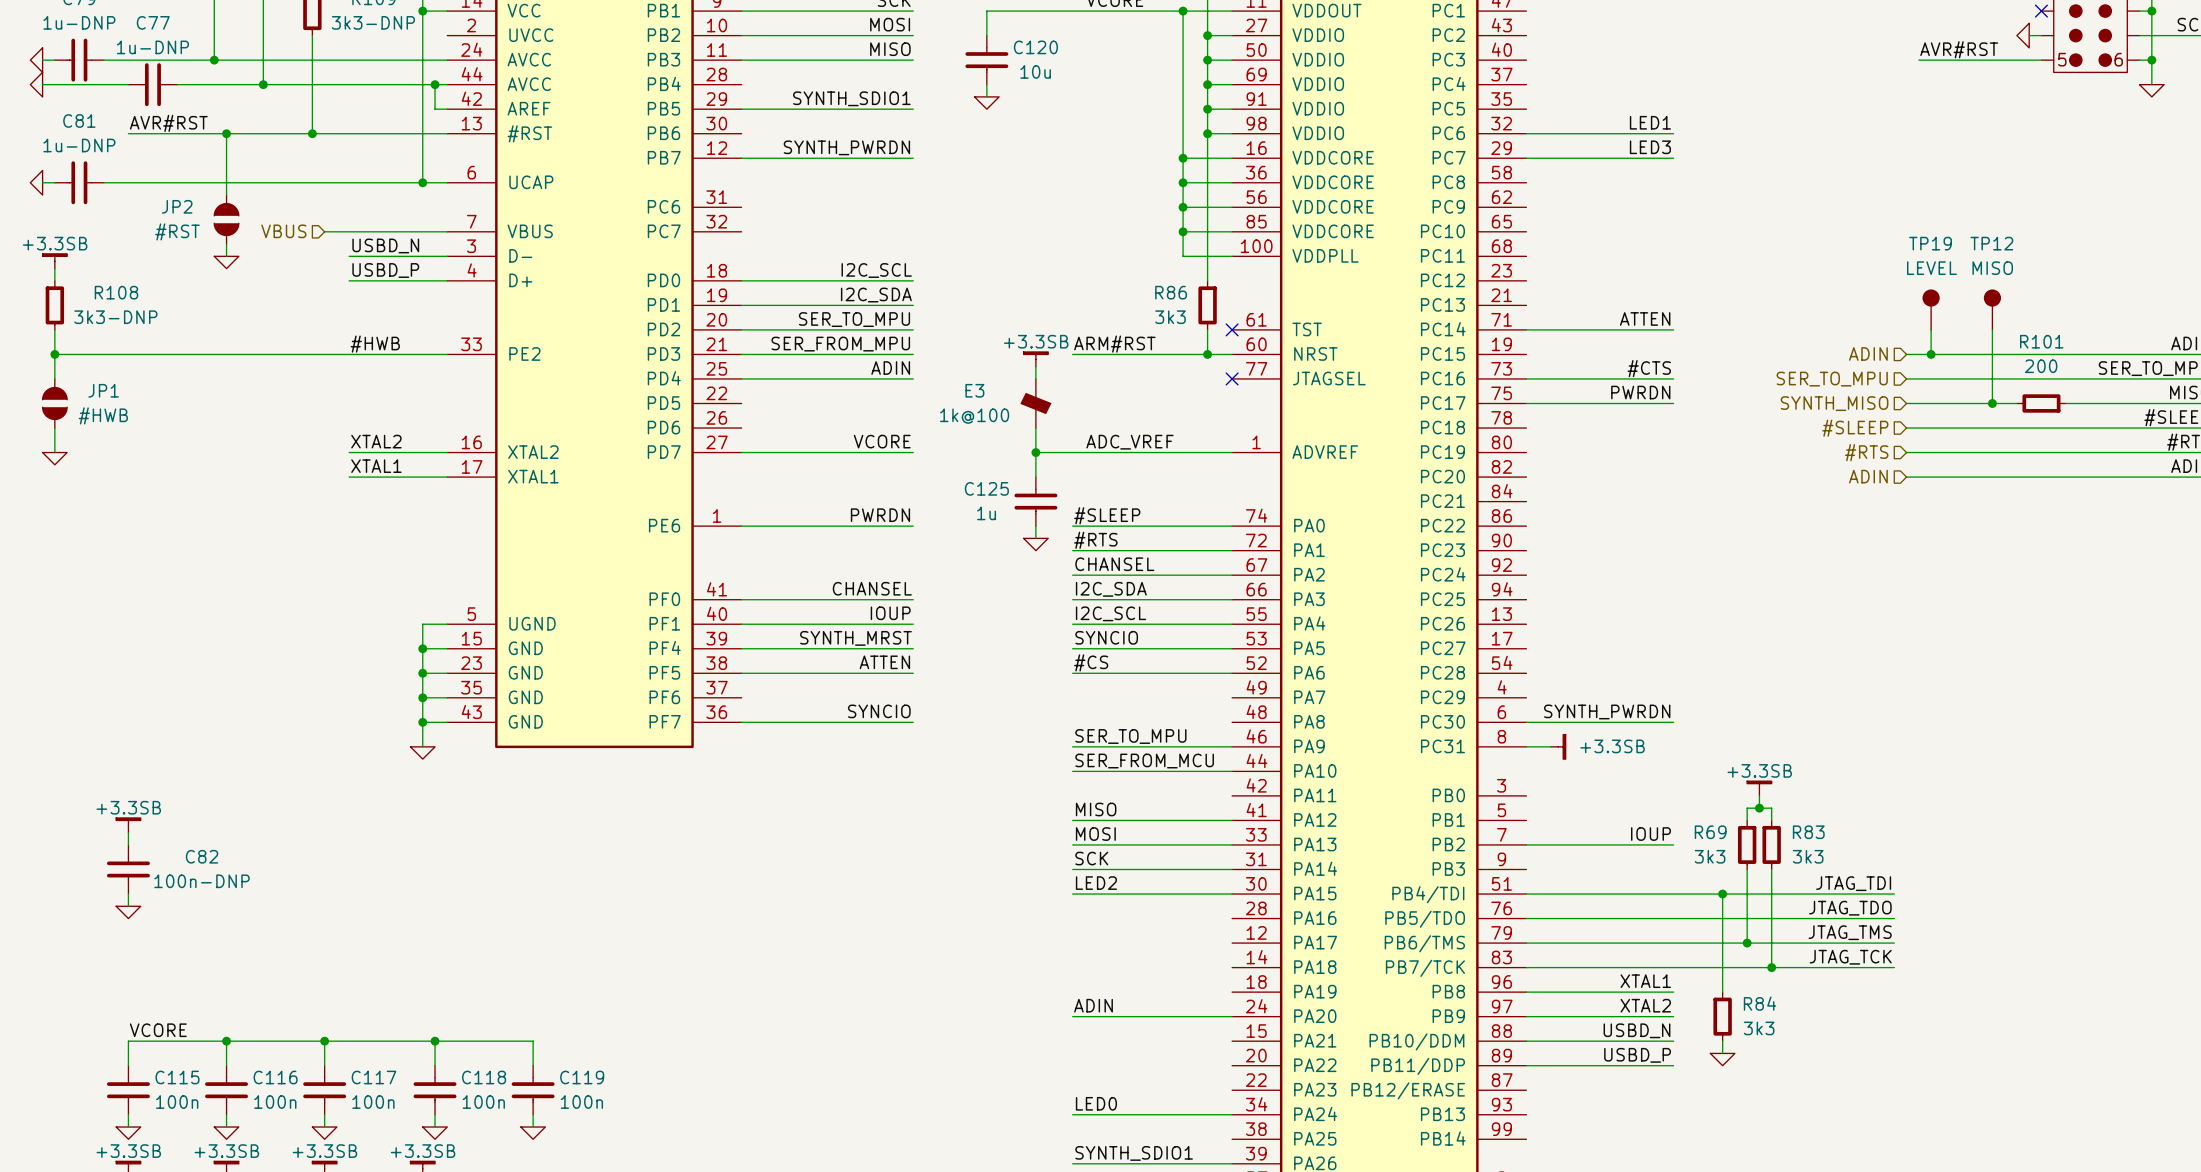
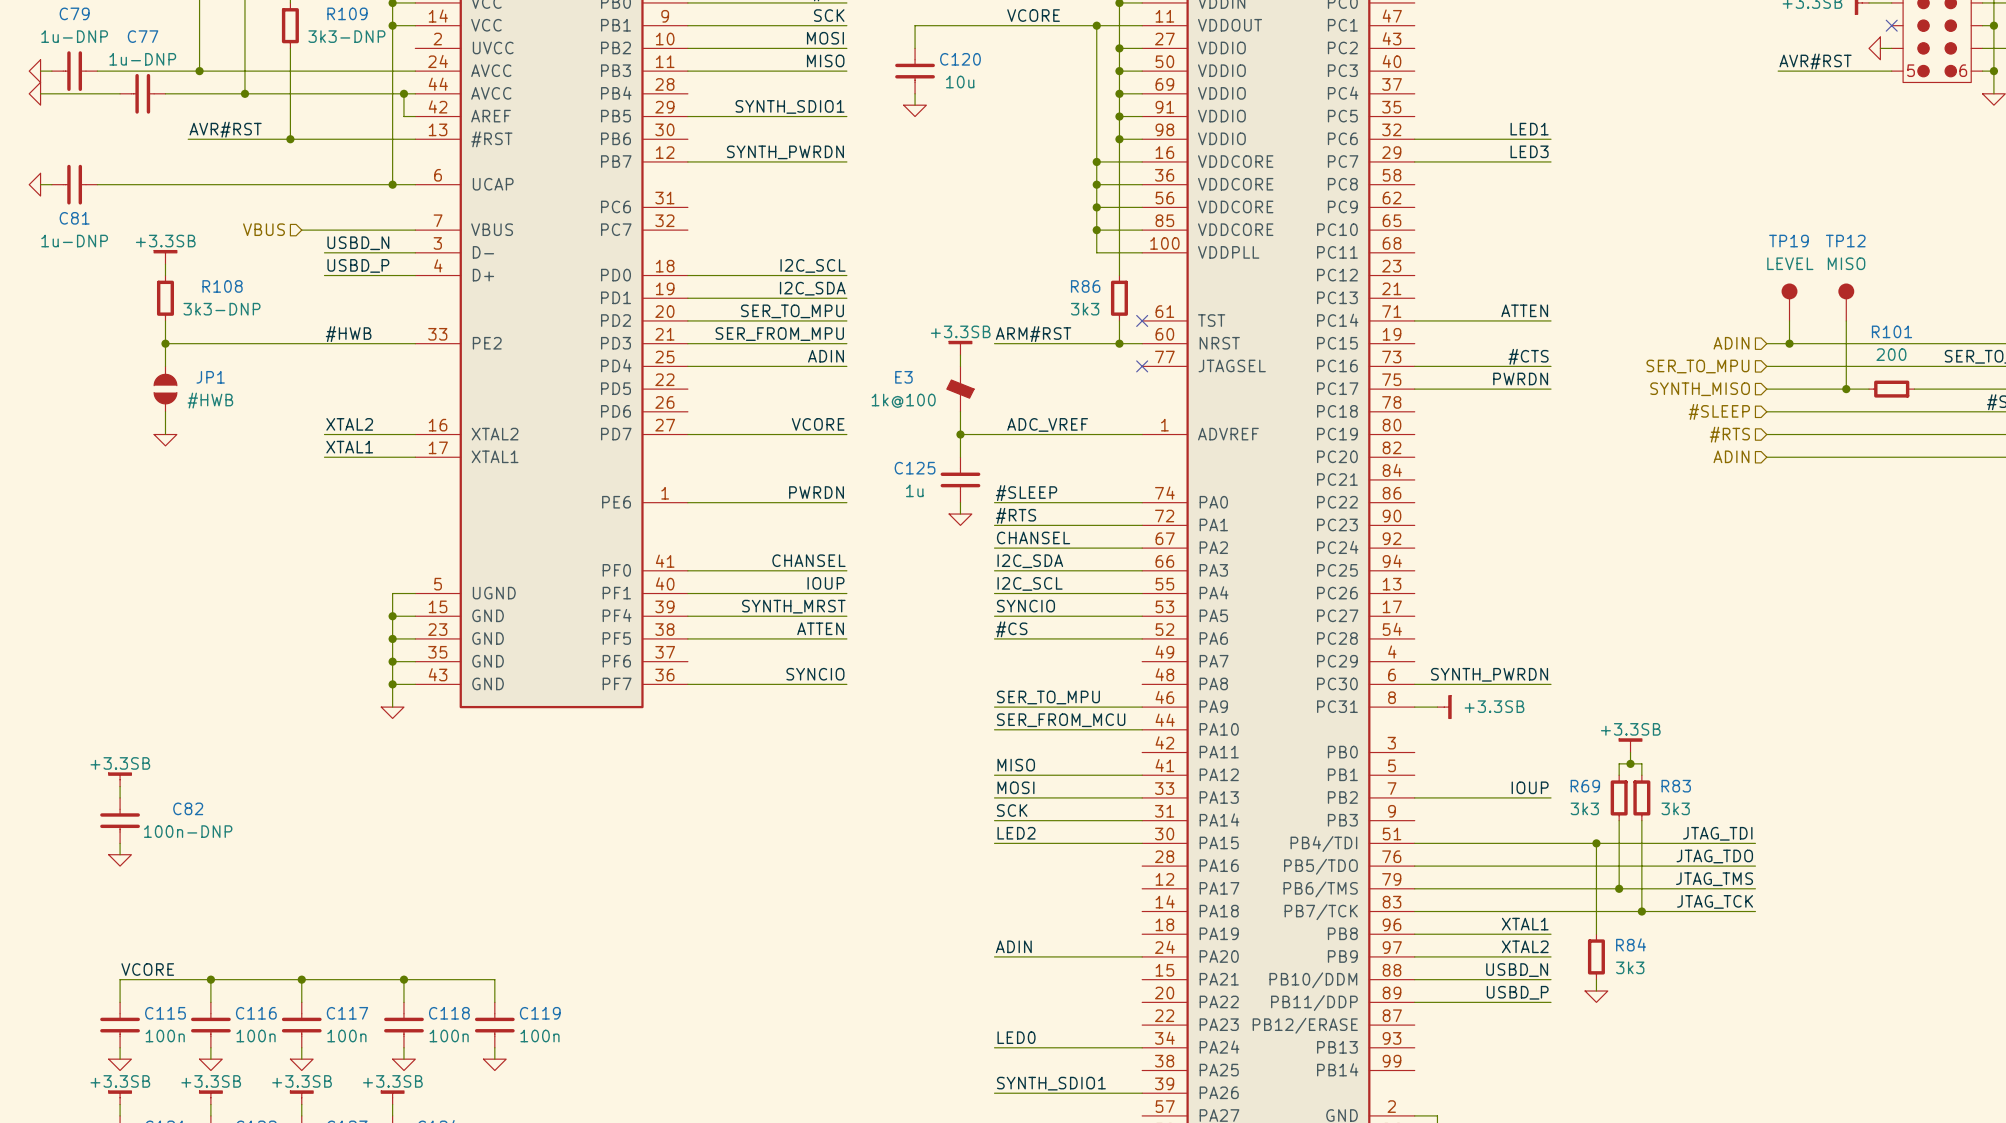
C81 name position: C81 (79, 120) -> C81 (74, 218)
label position: AVR#RST (168, 123) -> AVR#RST (225, 129)
wire: (128, 133) (202, 133) -> none
wire: (226, 133) (226, 195) -> none
junction: (226, 133) -> none
C81 value position: 1u-DNP (79, 145) -> 1u-DNP (74, 241)
JP2: #RST (226, 219) -> none
wire: (226, 244) (226, 256) -> none
power symbol position: +3.3SB (54, 261) -> +3.3SB (165, 257)
power symbol: (226, 262) -> none
wire: (54, 268) (54, 280) -> (165, 264) (165, 275)
R108 position: (54, 305) -> (165, 298)
wire: (54, 329) (54, 378) -> (165, 320) (165, 366)
wire: (54, 354) (177, 354) -> none
junction: (54, 354) -> none
junction: none -> (165, 343)
JP1 position: (54, 403) -> (165, 389)
wire: (54, 428) (54, 452) -> (165, 411) (165, 434)
power symbol: (54, 458) -> none
power symbol: none -> (165, 440)

